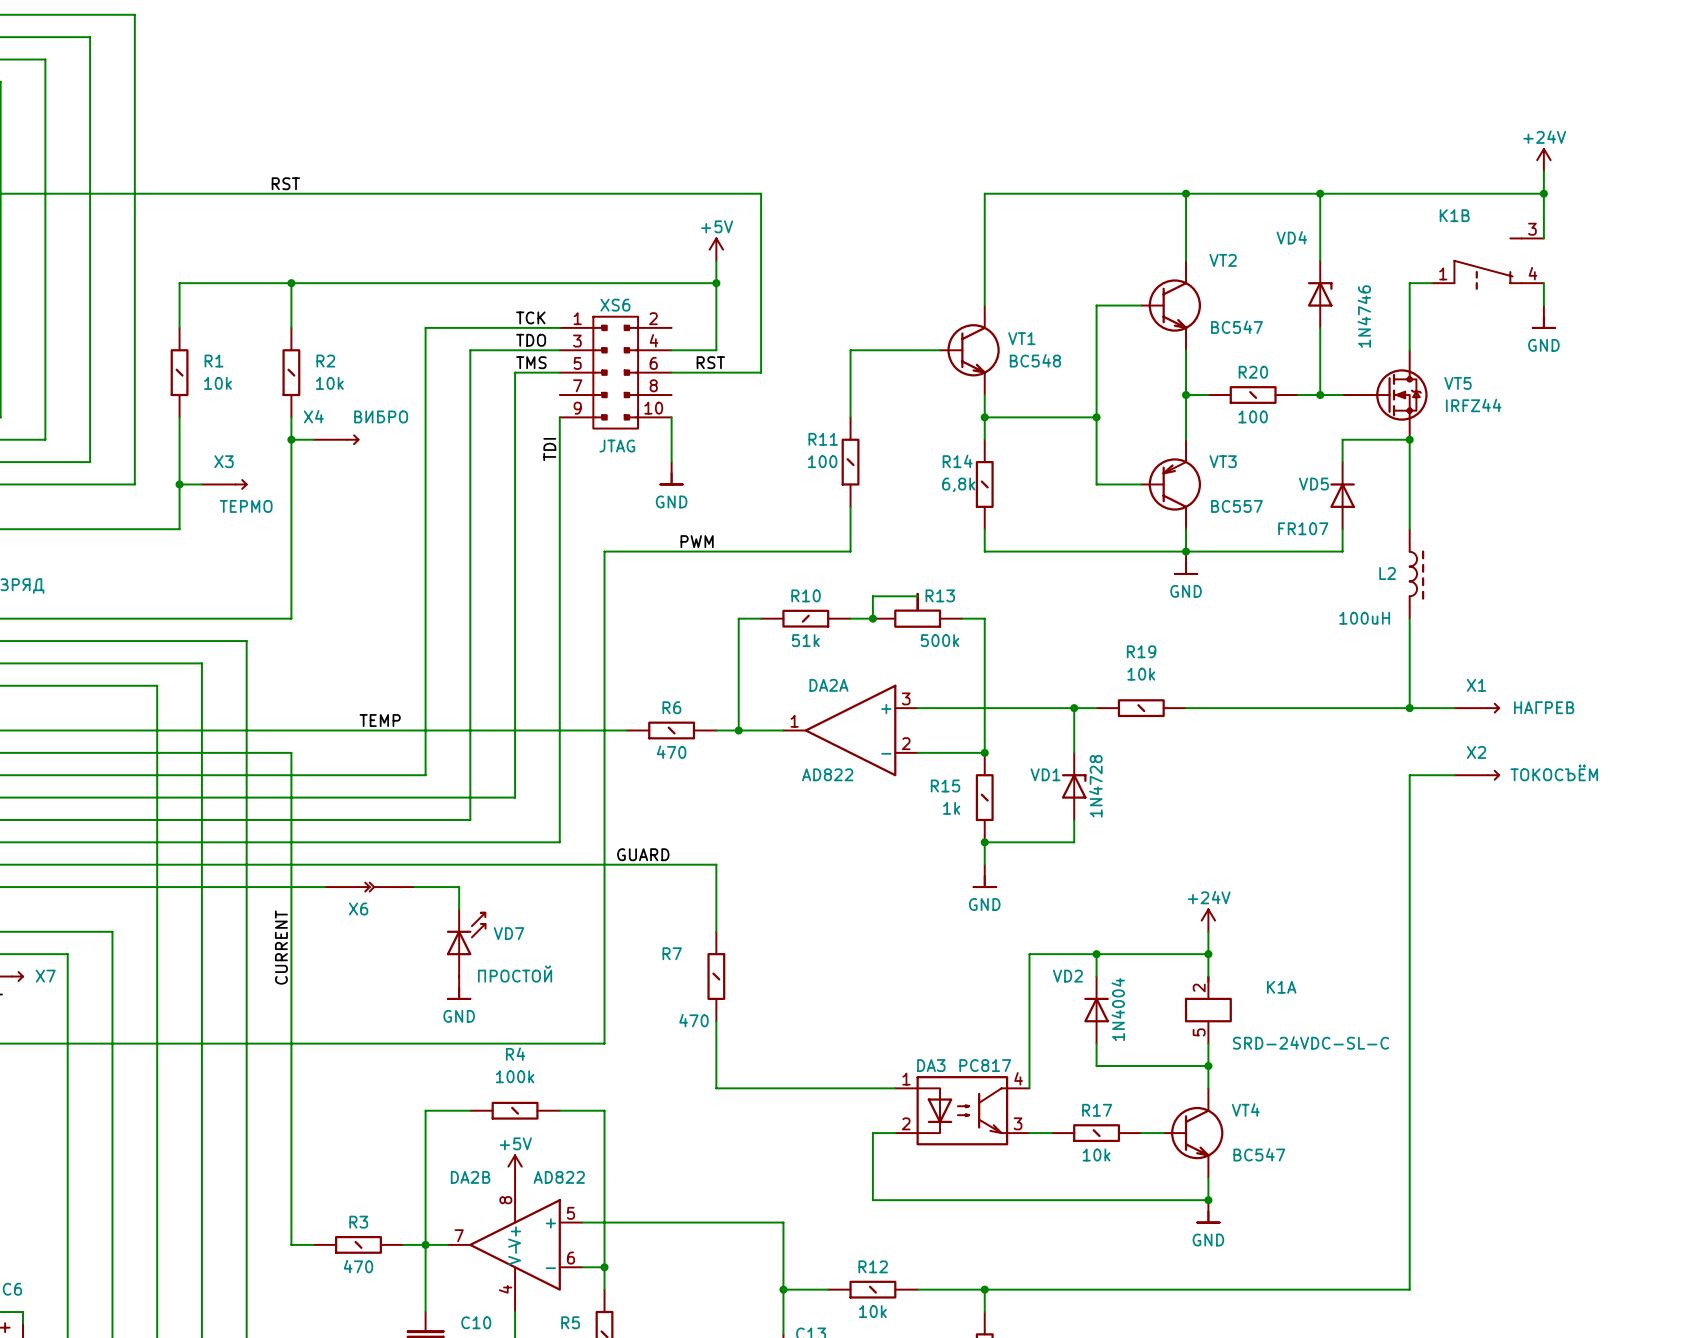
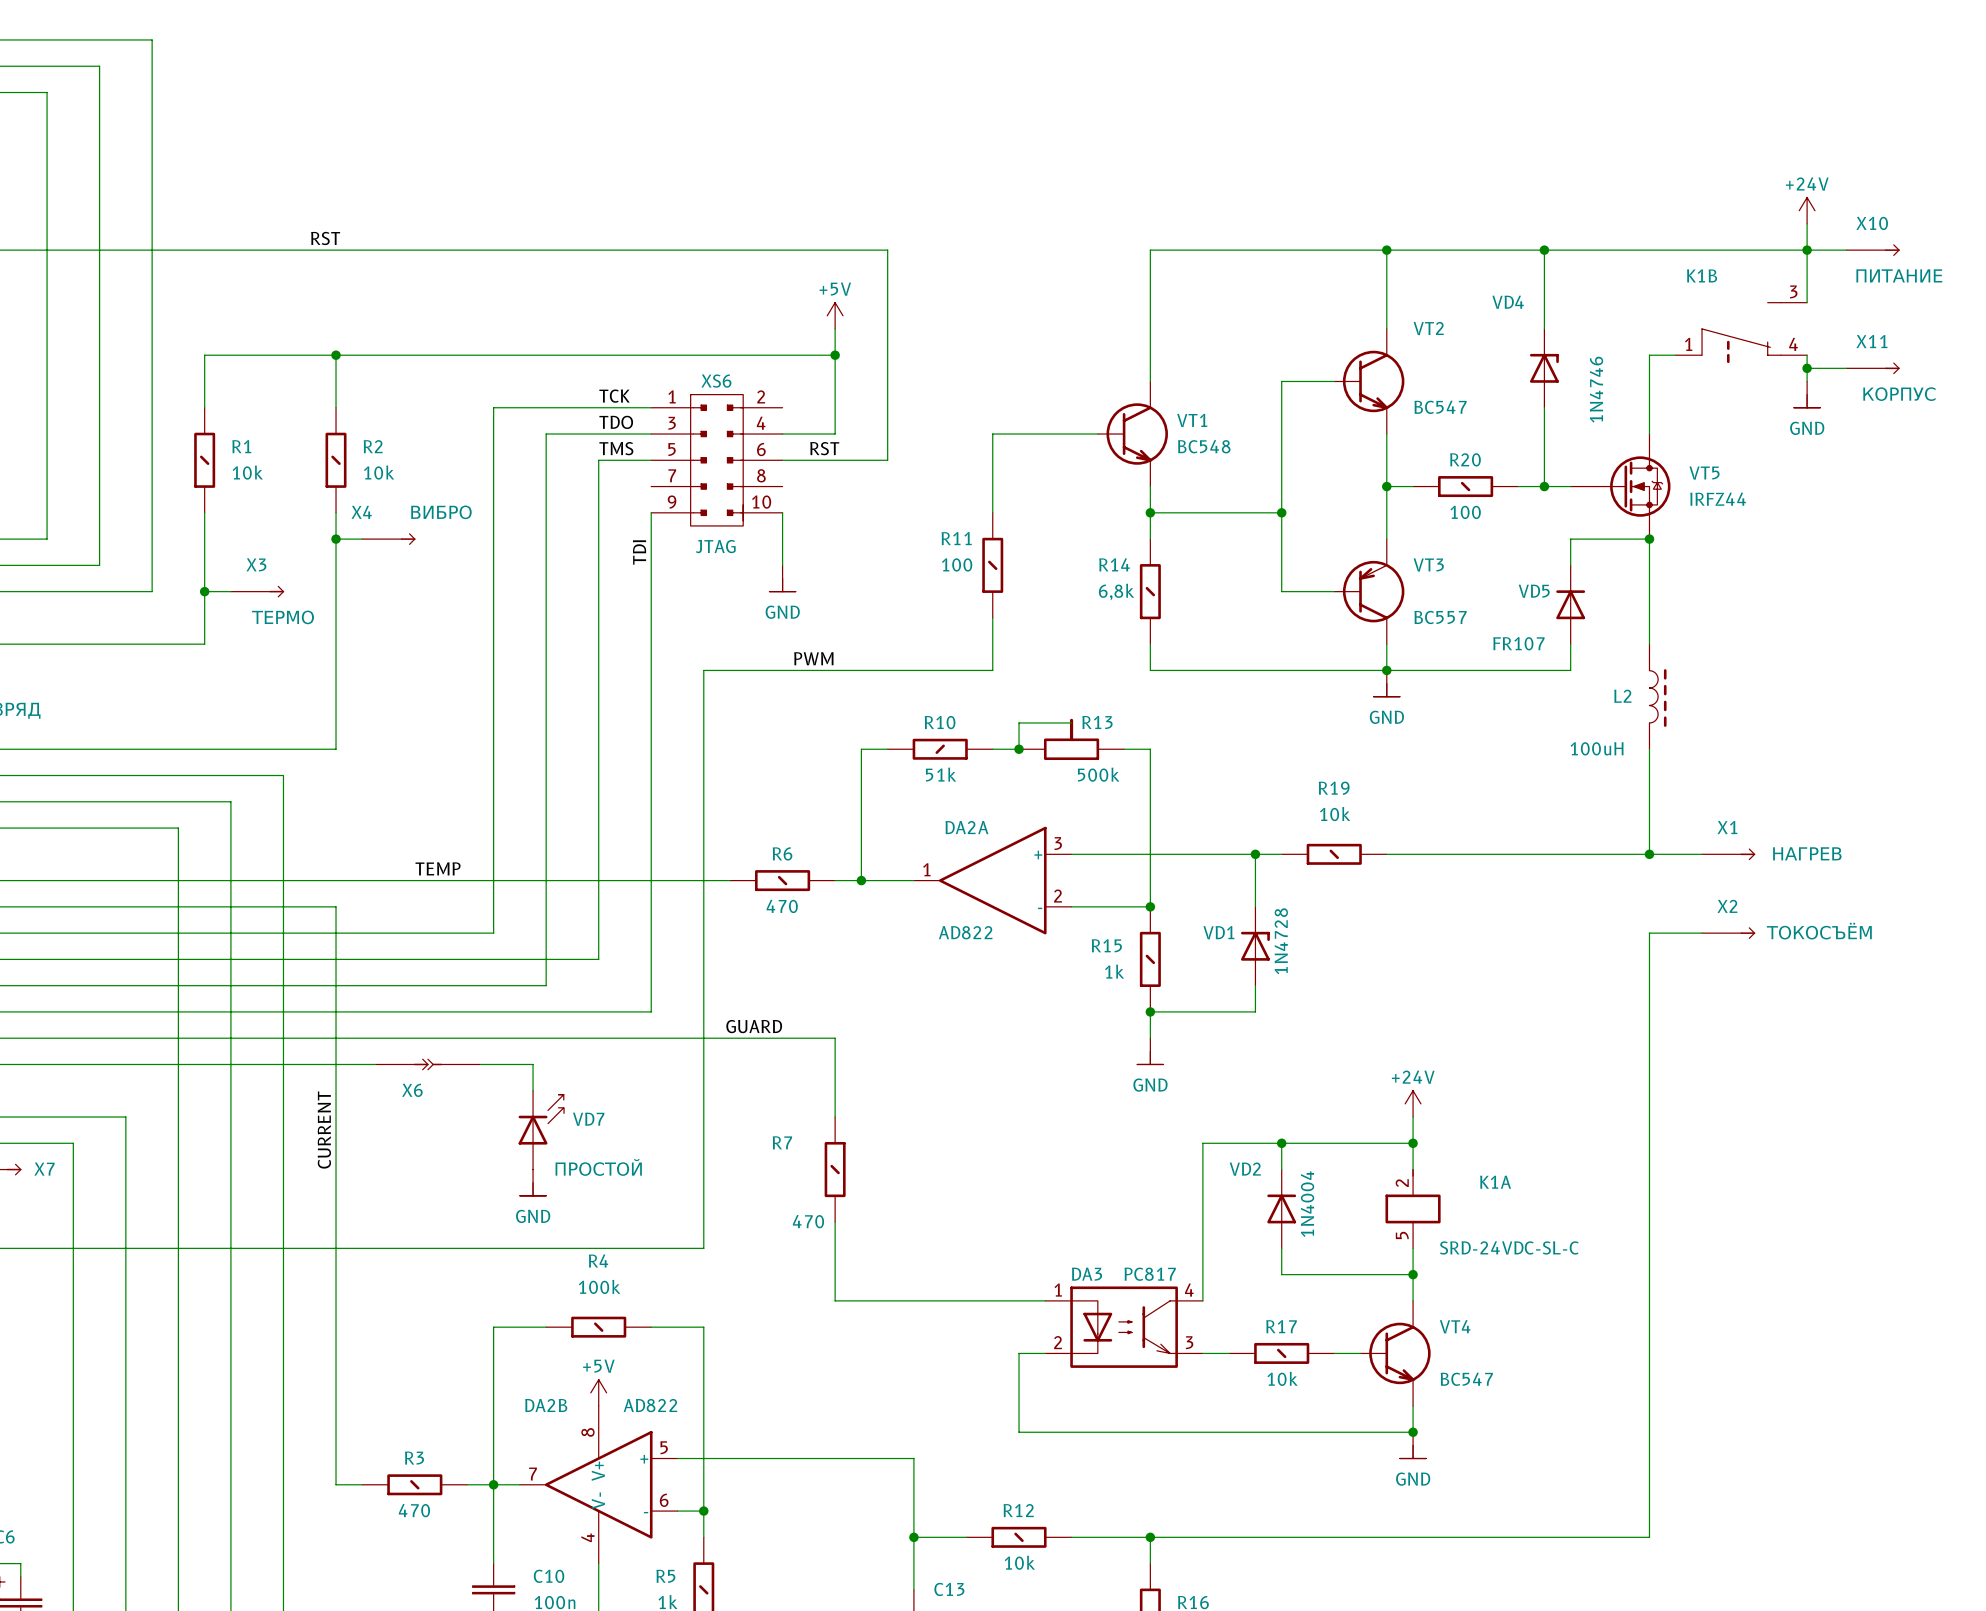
wire: none -> (1807, 250) (1846, 250)
X10: none -> ПИТАНИЕ (1873, 250)
wire: none -> (1807, 368) (1846, 368)
junction: none -> (1807, 368)
X11: none -> КОРПУС (1873, 368)

